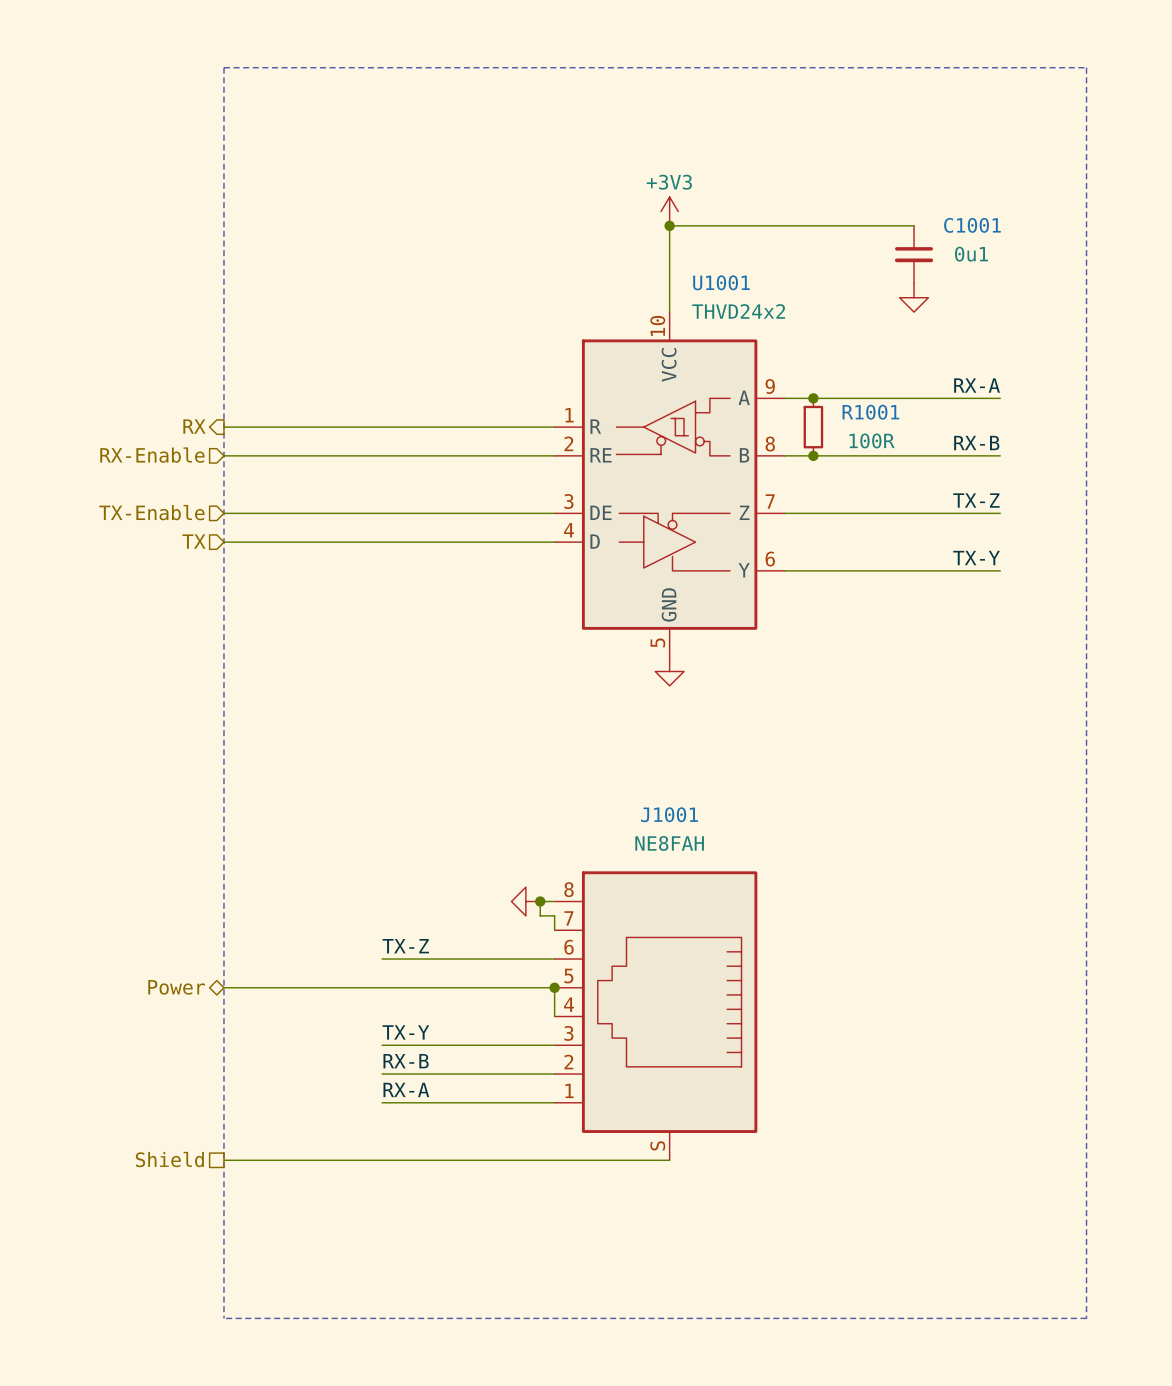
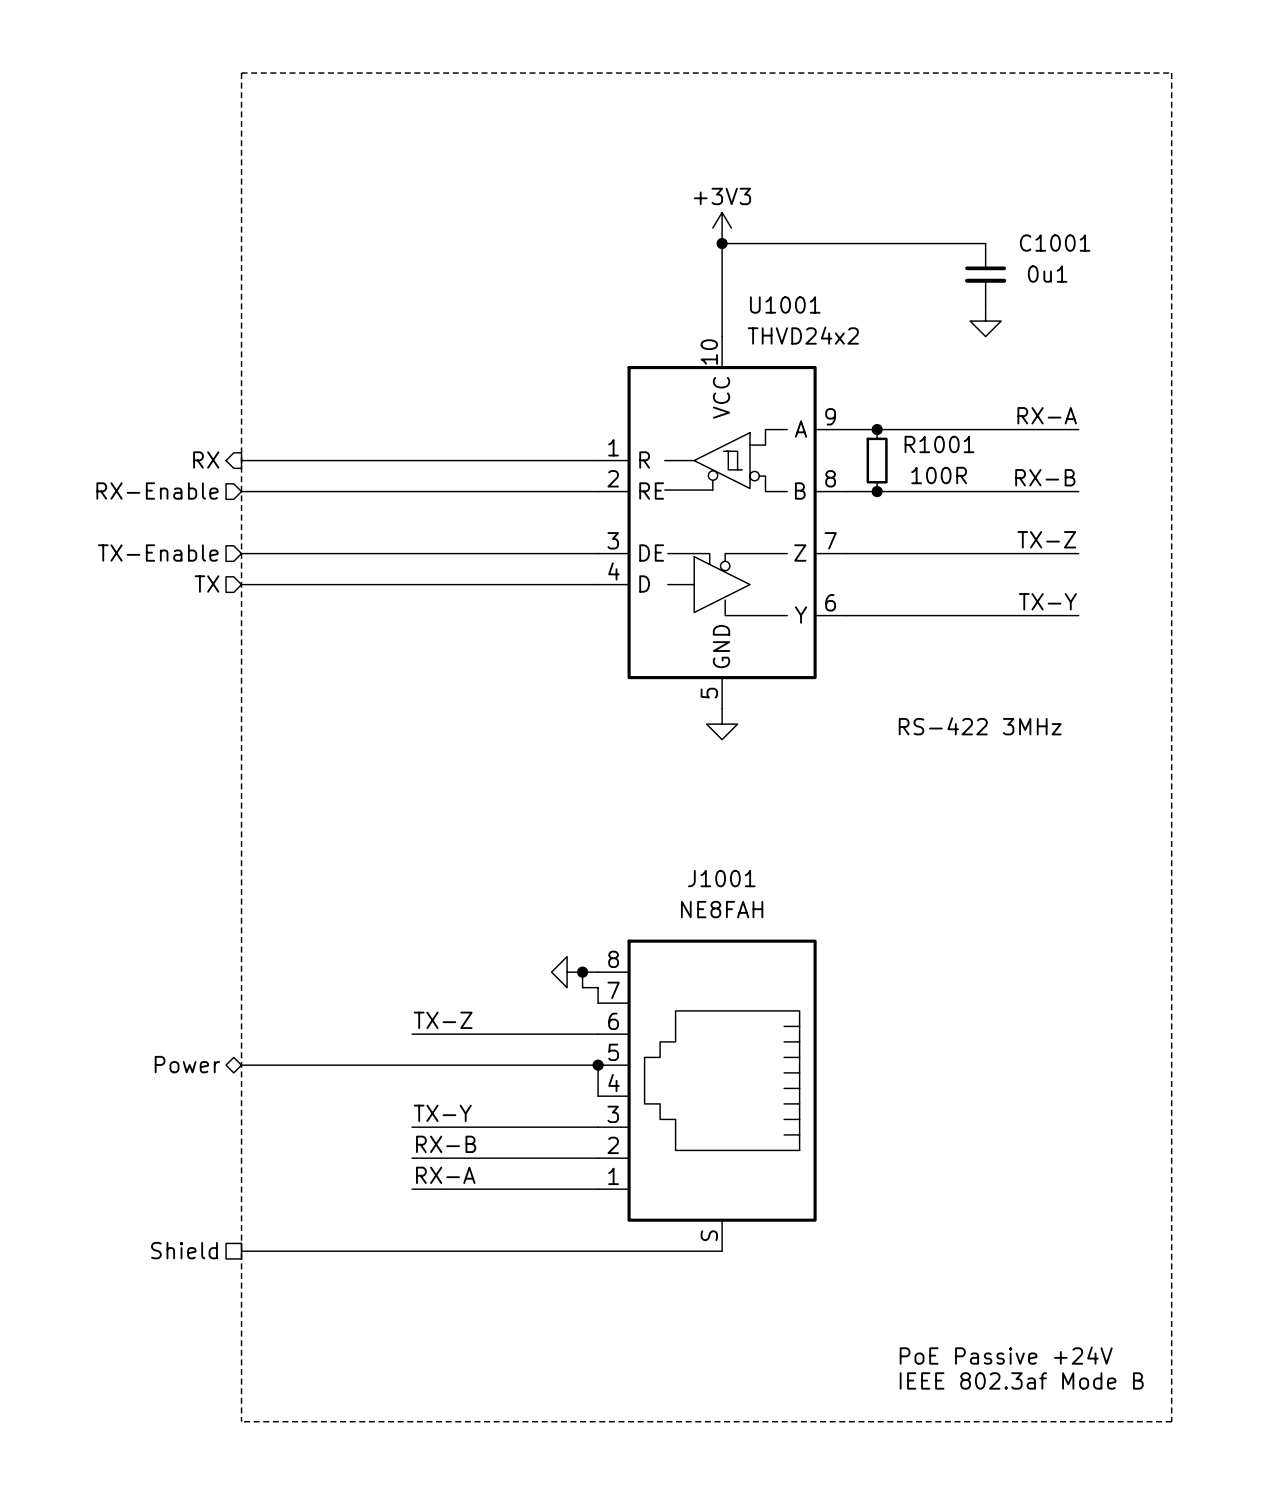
text: none -> RS-422 3MHz (980, 726)
text: none -> PoE Passive +24V (1006, 1355)
text: none -> IEEE 802.3af Mode B (1021, 1380)

